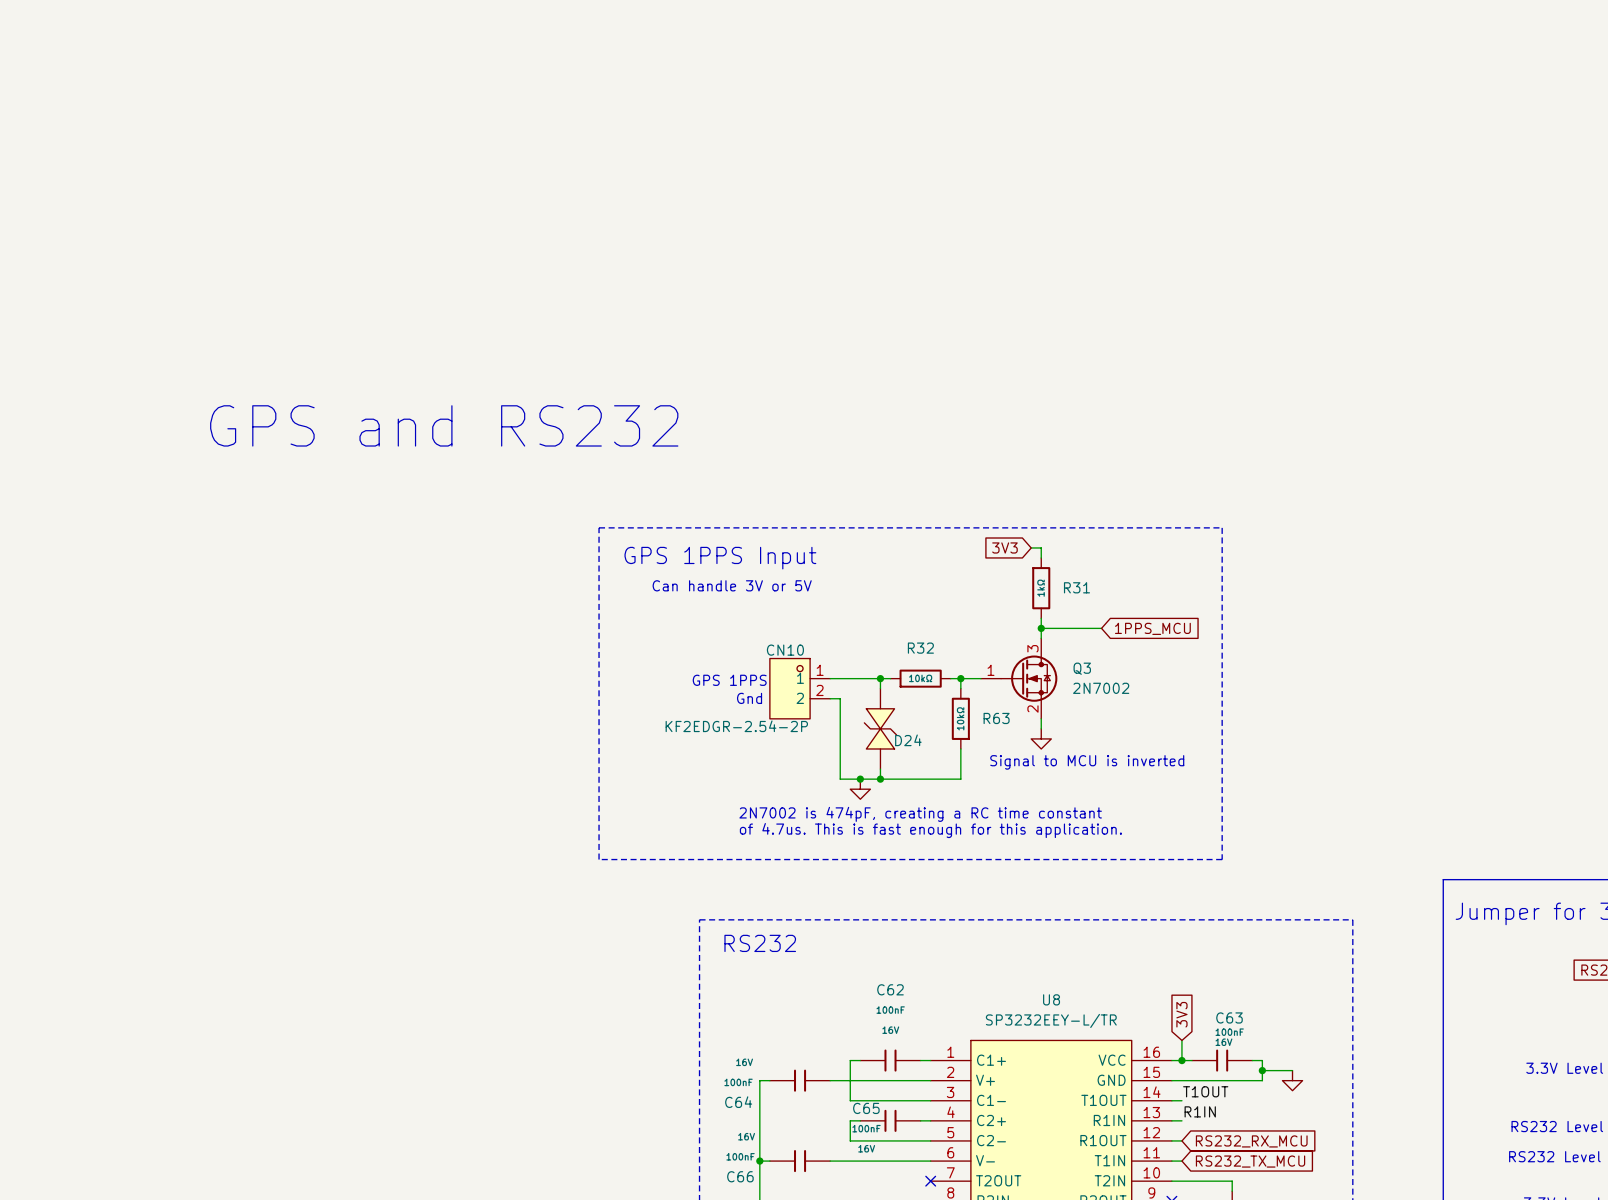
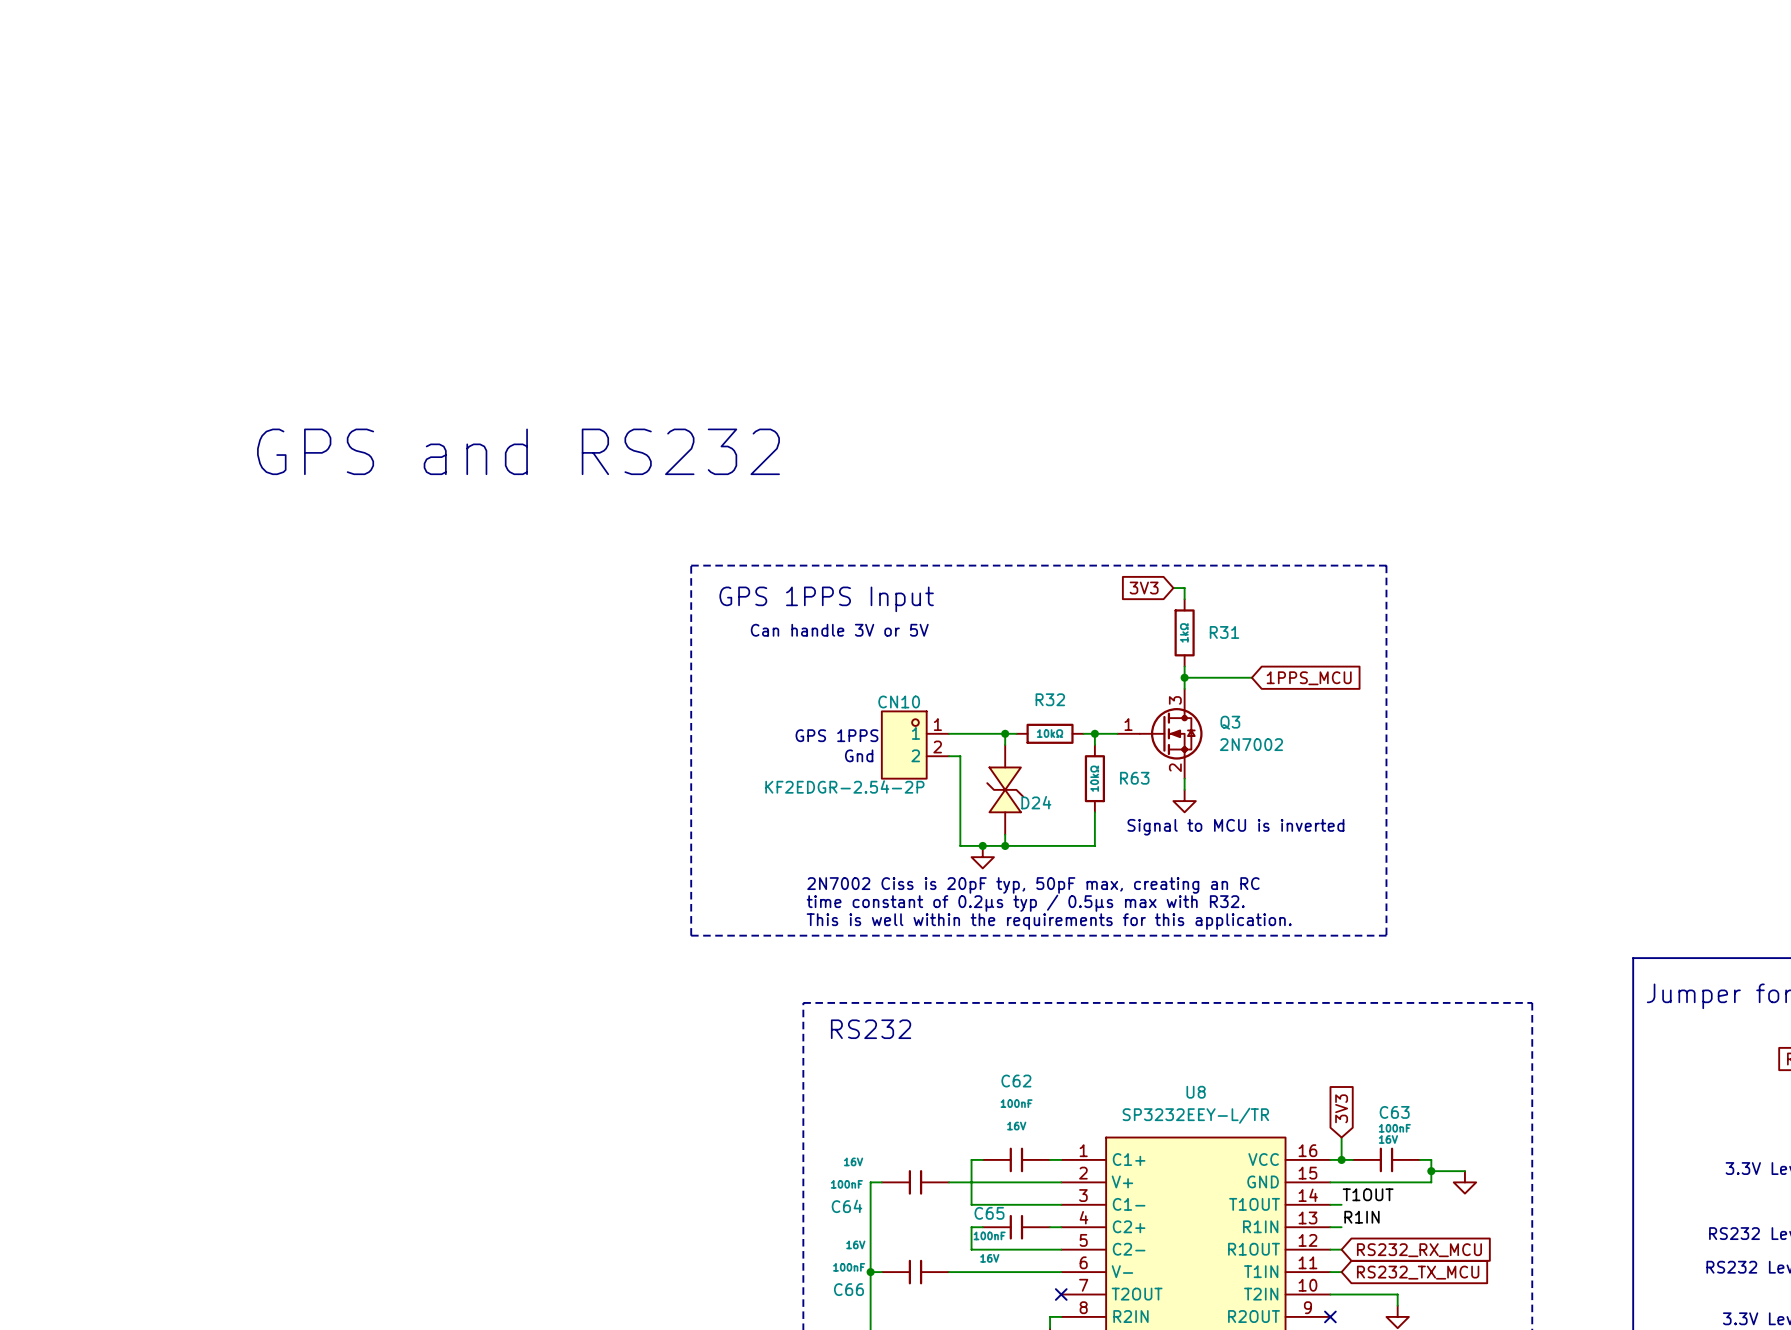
text: none -> 2N7002 Ciss is 20pF typ, 50pF max, creating an RC (1033, 885)
text: 2N7002 is 474pF, creating a RC time constant (920, 814) -> none
text: none -> time constant of 0.2µs typ / 0.5µs max with R32. (1025, 903)
text: of 4.7us. This is fast enough for this application. (930, 830) -> This is well within the requirements for this application. (1049, 921)

